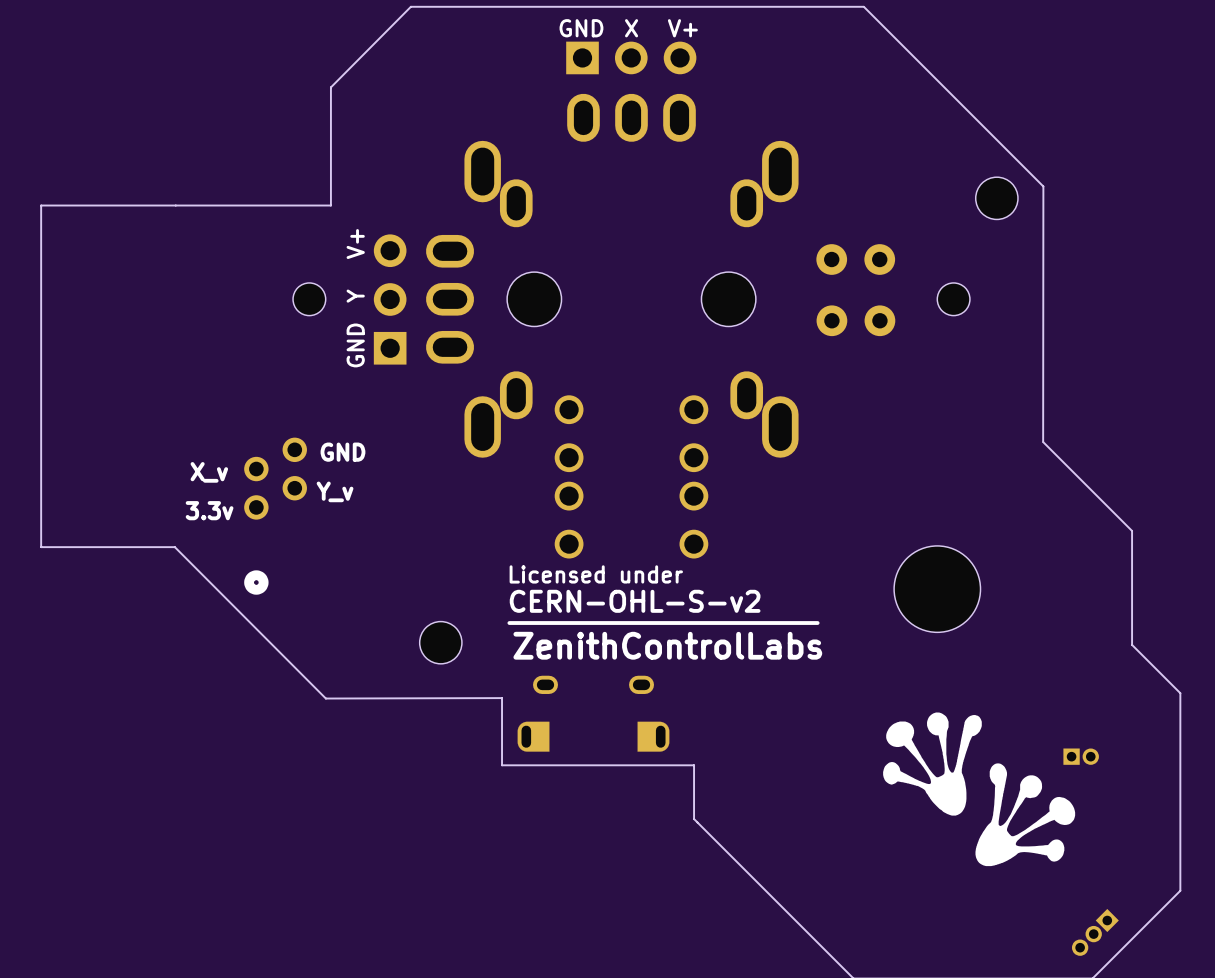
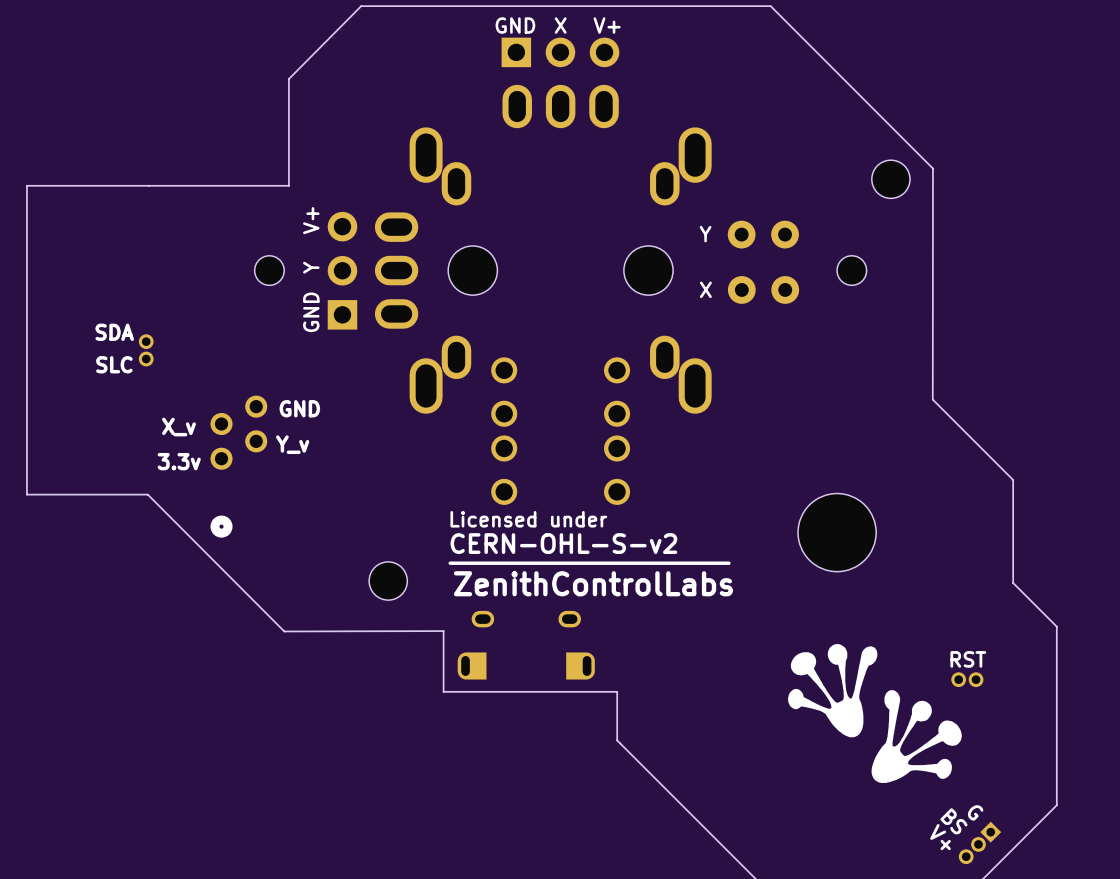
text: none -> Y (705, 234)
text: none -> X (705, 289)
text: none -> SDA (114, 332)
part: none -> (146, 350)
text: none -> SLC (114, 364)
text: none -> RST (968, 659)
part footprint: [1063, 748, 1099, 765] -> [951, 672, 984, 688]
text: none -> G (975, 812)
text: none -> BS (953, 821)
text: none -> V+ (940, 837)

